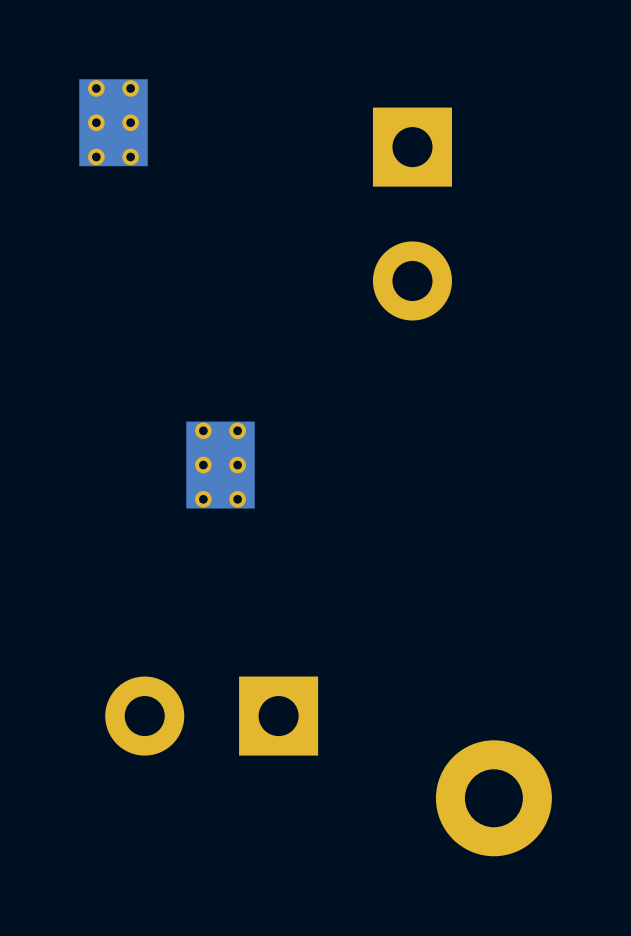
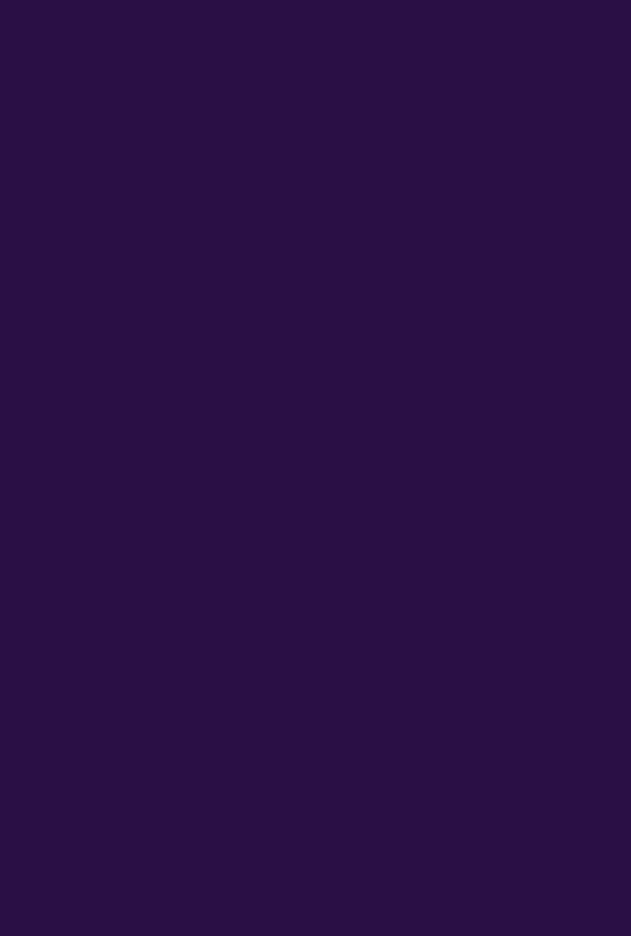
part: (113, 122) -> none
part: (412, 214) -> none
part: (220, 465) -> none
part: (211, 716) -> none
part: (493, 798) -> none

